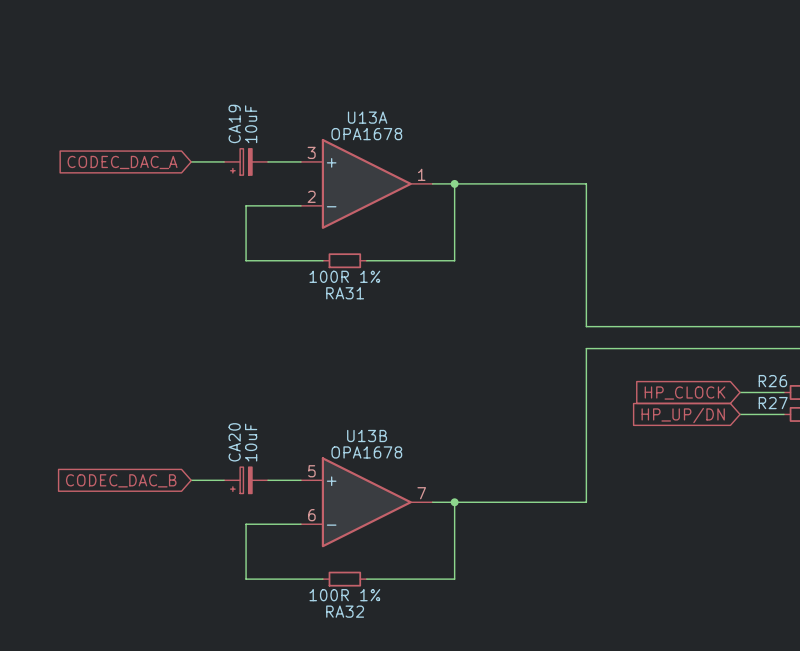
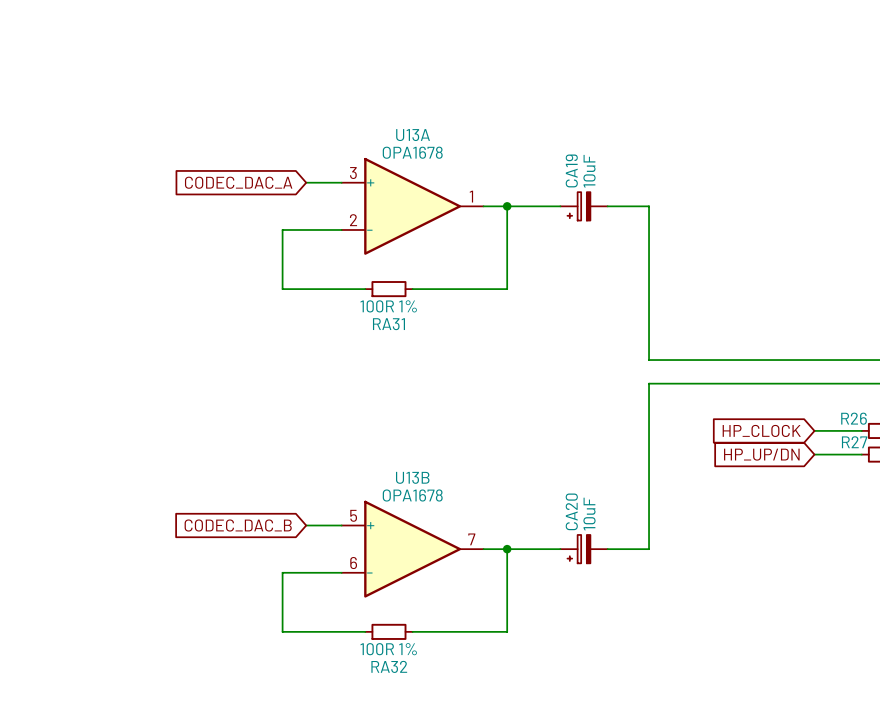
wire: (191, 161) (224, 161) -> none
CA19 position: (246, 161) -> (584, 206)
global label position: CODEC_DAC_A (122, 162) -> CODEC_DAC_A (238, 182)
global label position: CODEC_DAC_B (121, 480) -> CODEC_DAC_B (238, 525)
wire: (191, 480) (224, 480) -> none
CA20 position: (246, 480) -> (584, 549)

